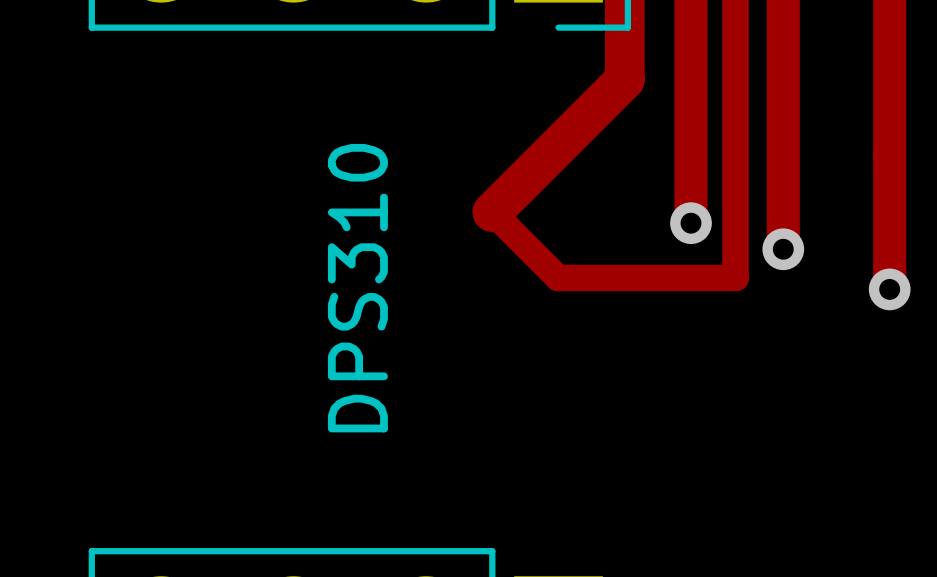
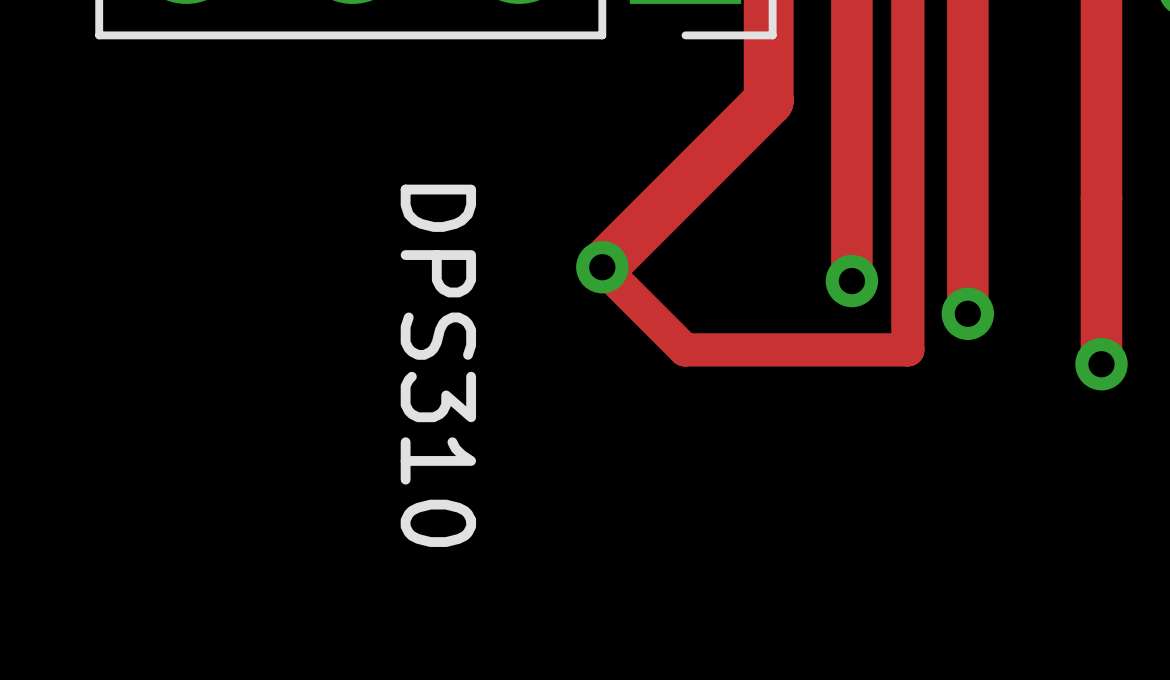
via: none -> (602, 267)
text rotation: 0° (357, 288) -> 180° (438, 365)

